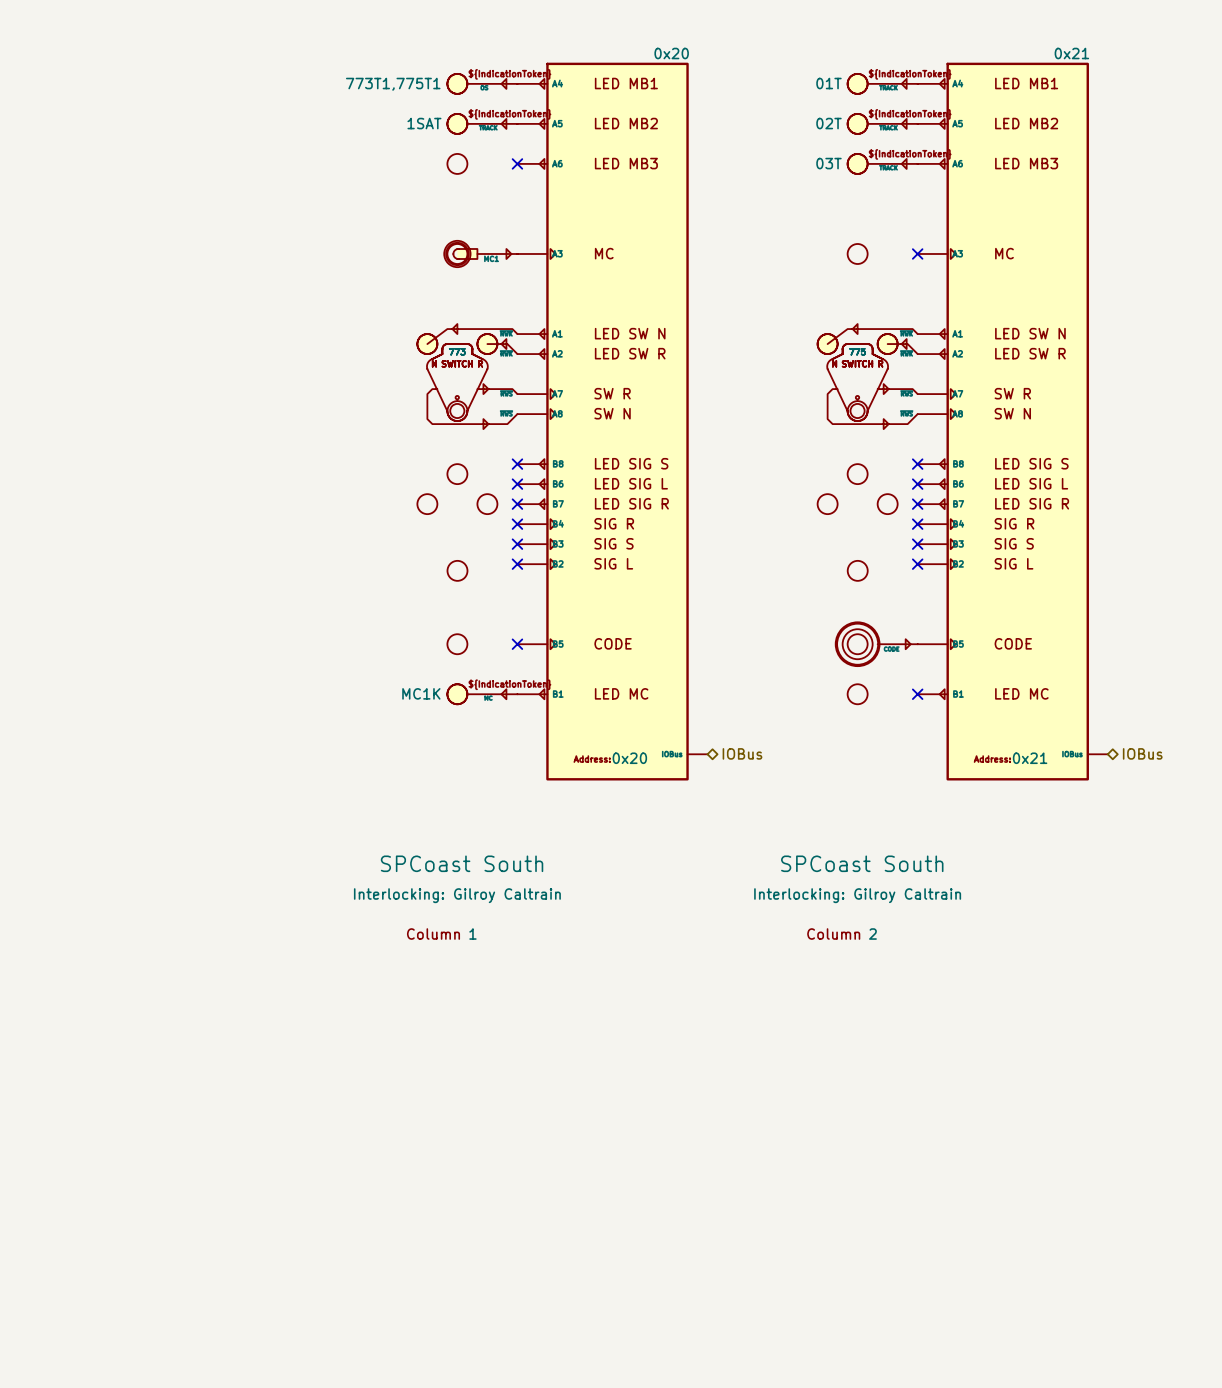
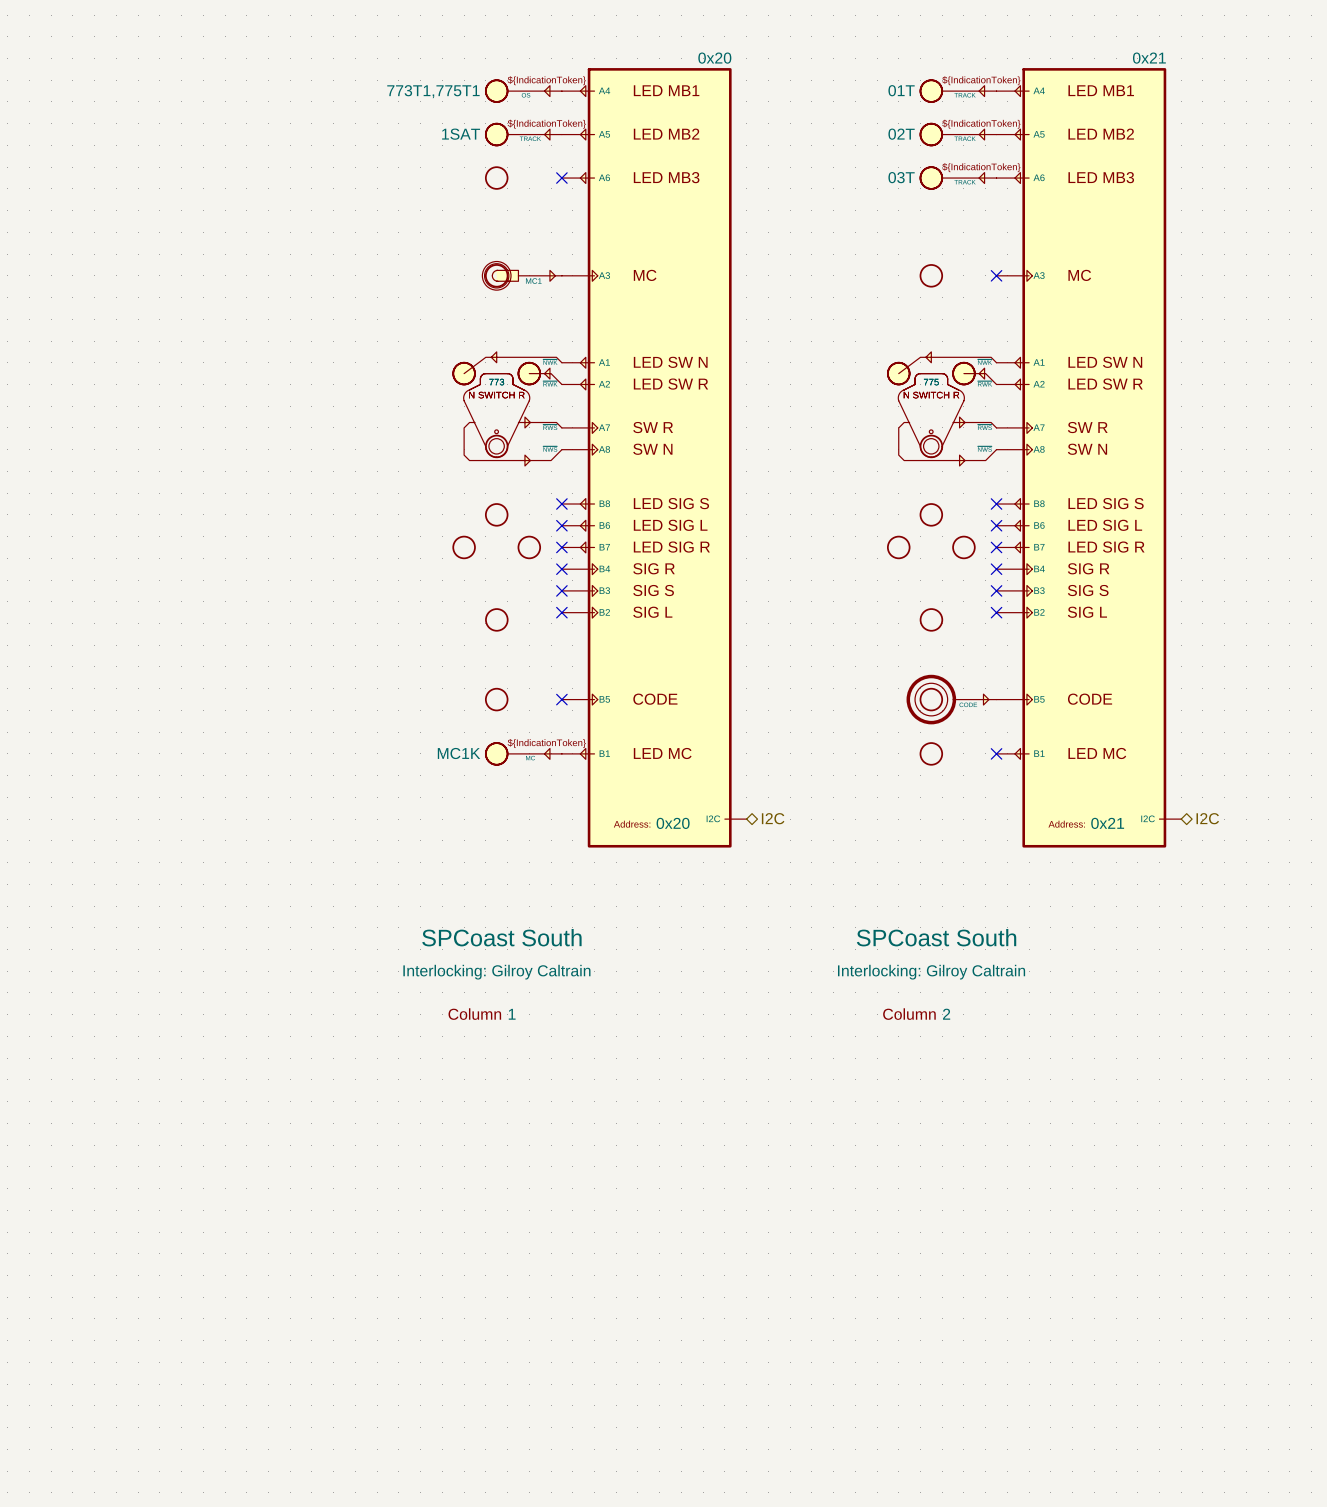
part: none -> 0x20 (654, 457)
part: 0x20 (612, 421) -> none
part: none -> 0x21 (1088, 457)
part: 0x21 (1012, 421) -> none
hierarchical label: none -> I2C (773, 818)
hierarchical label: IOBus (742, 753) -> none
hierarchical label: none -> I2C (1207, 818)
hierarchical label: IOBus (1142, 753) -> none

